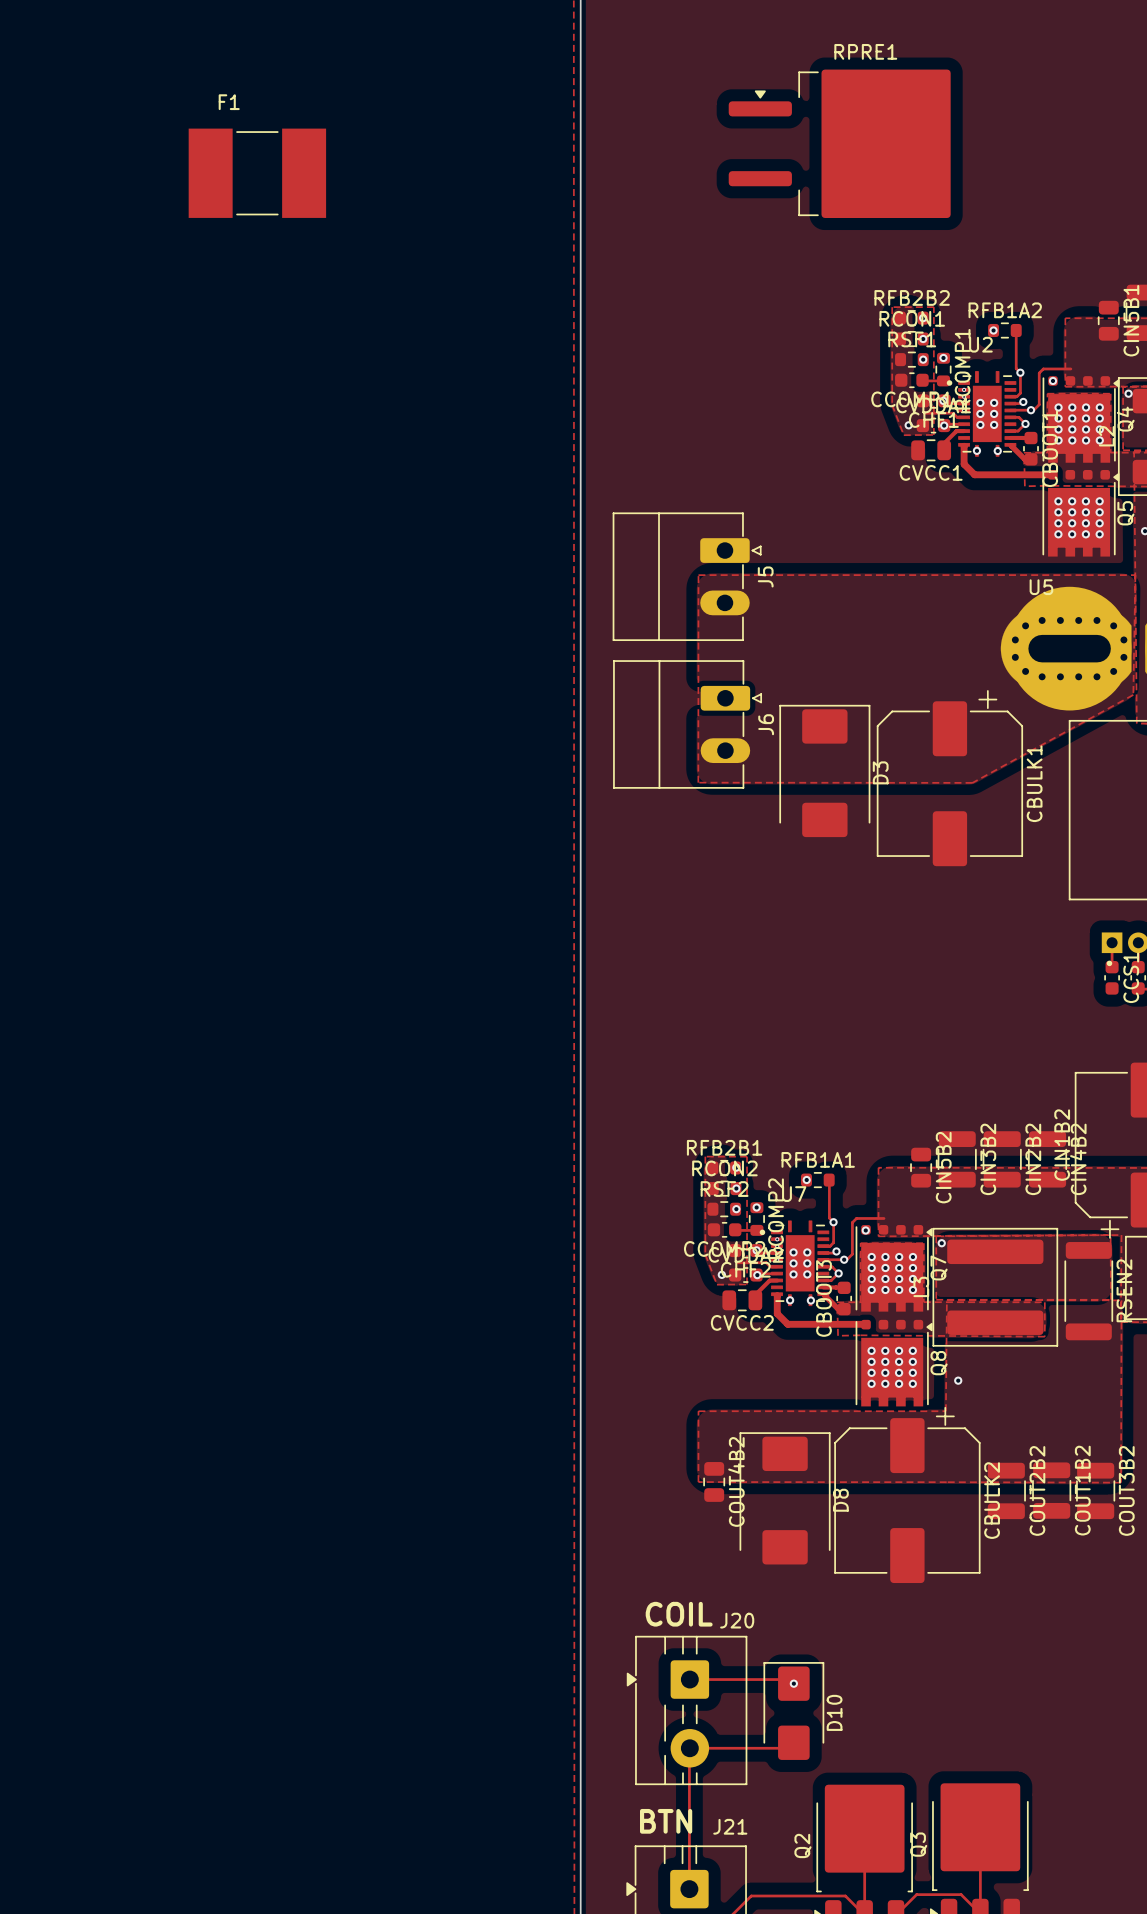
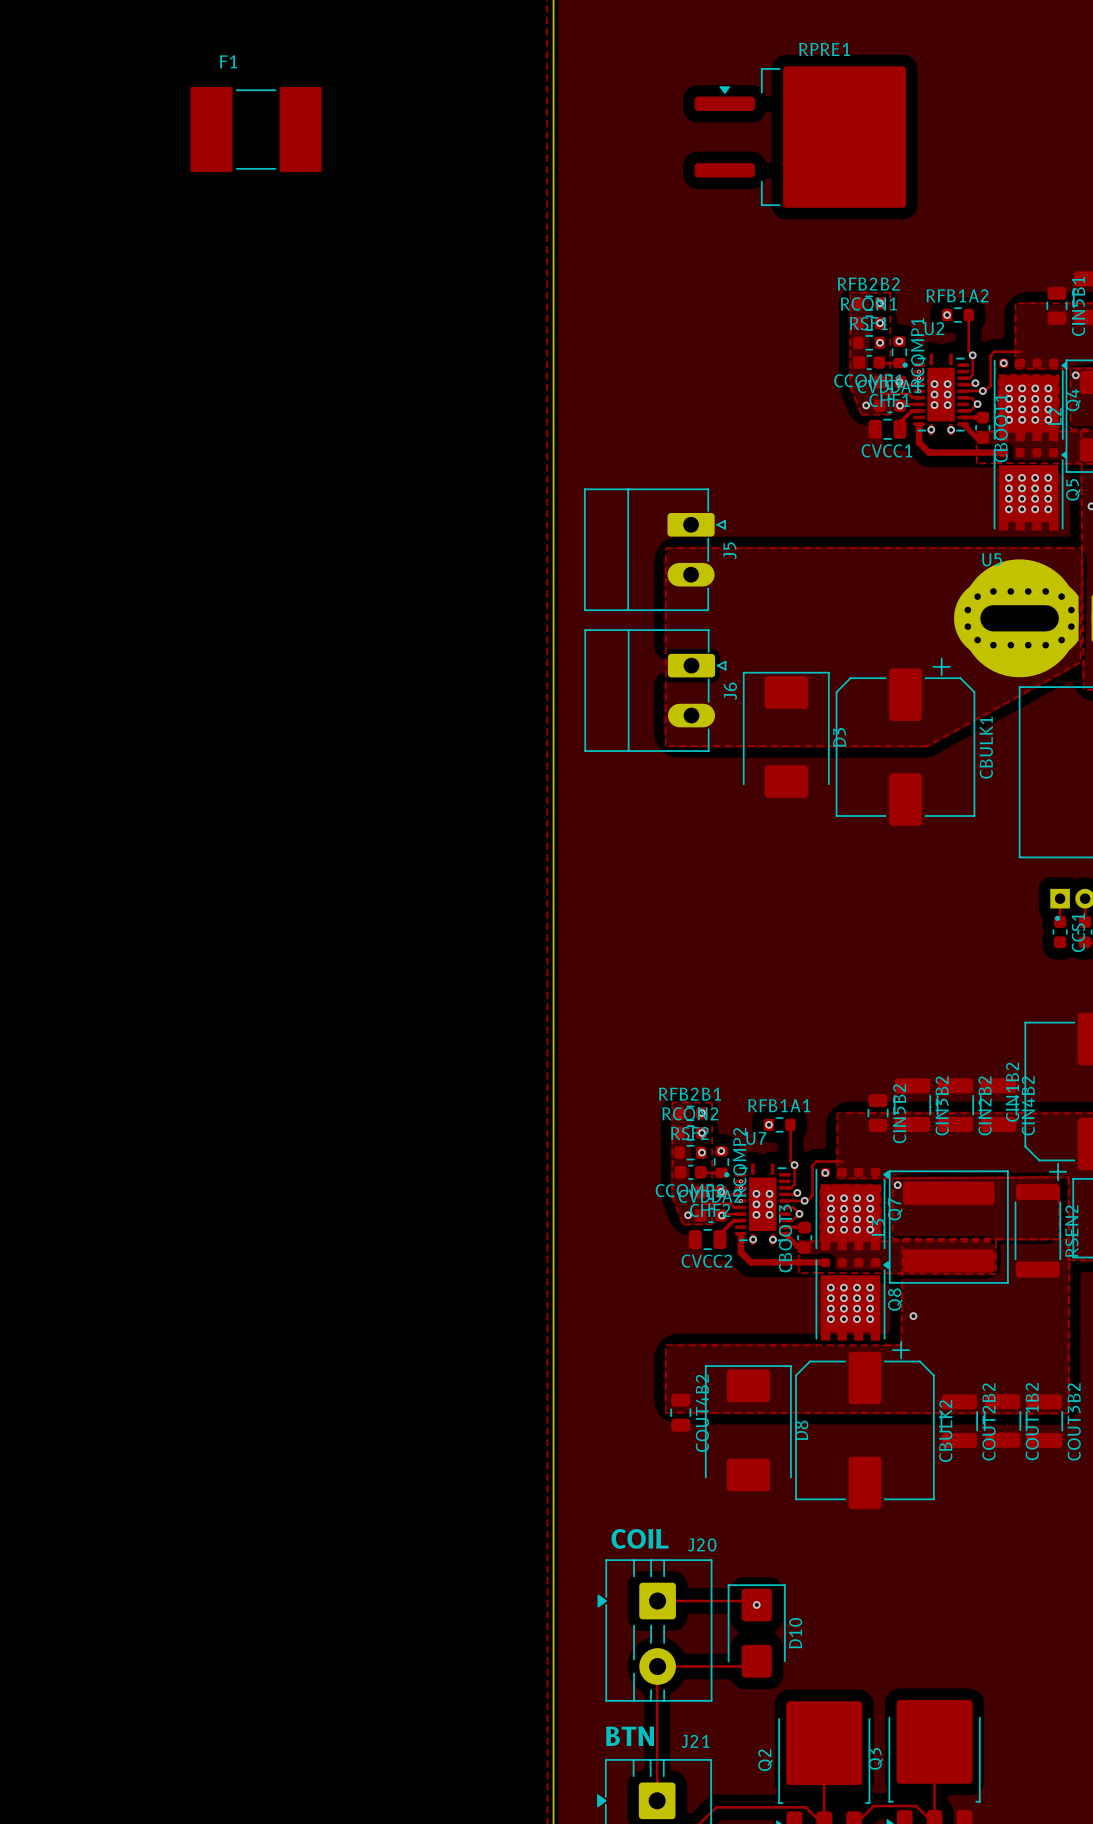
F1 position: (257, 173) -> (256, 129)

